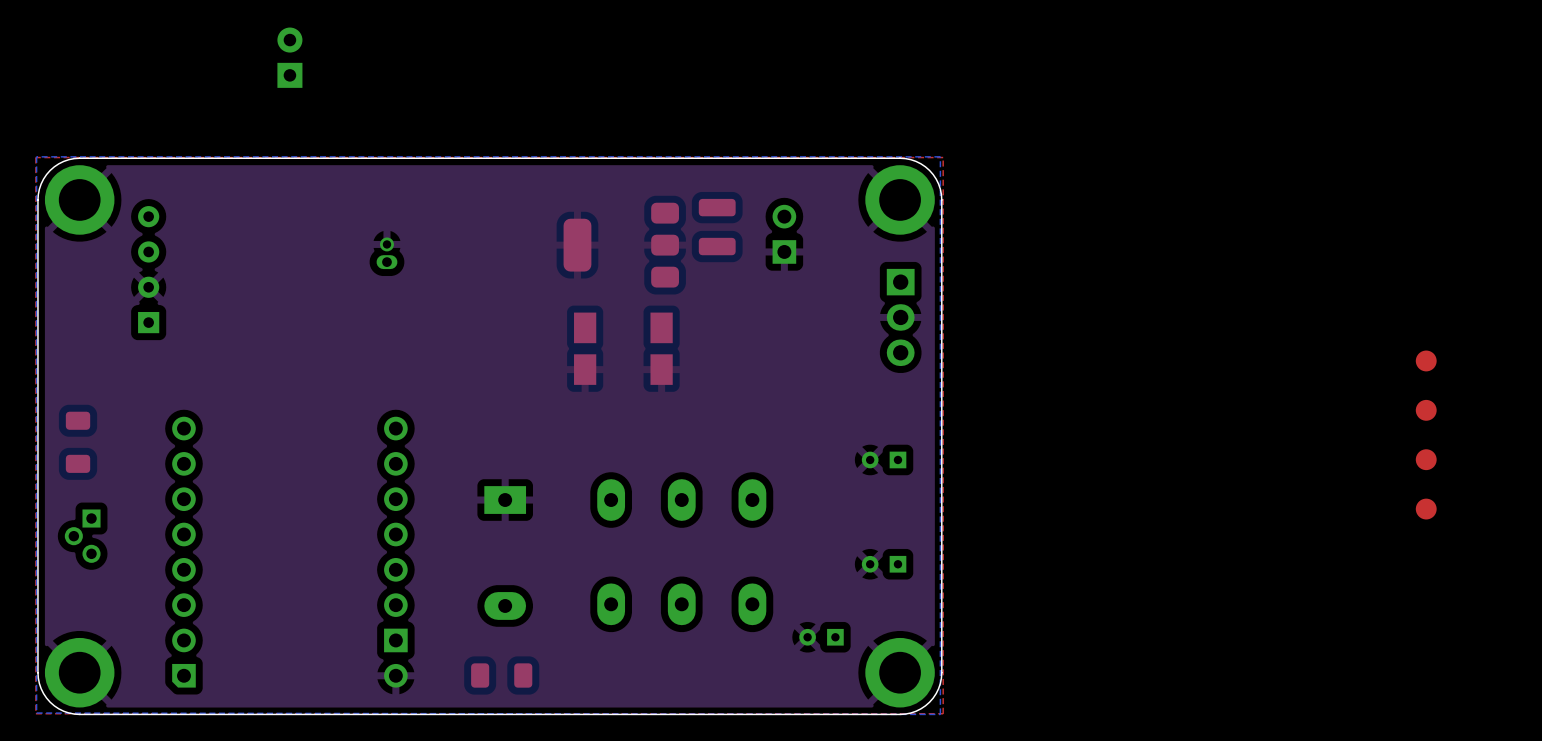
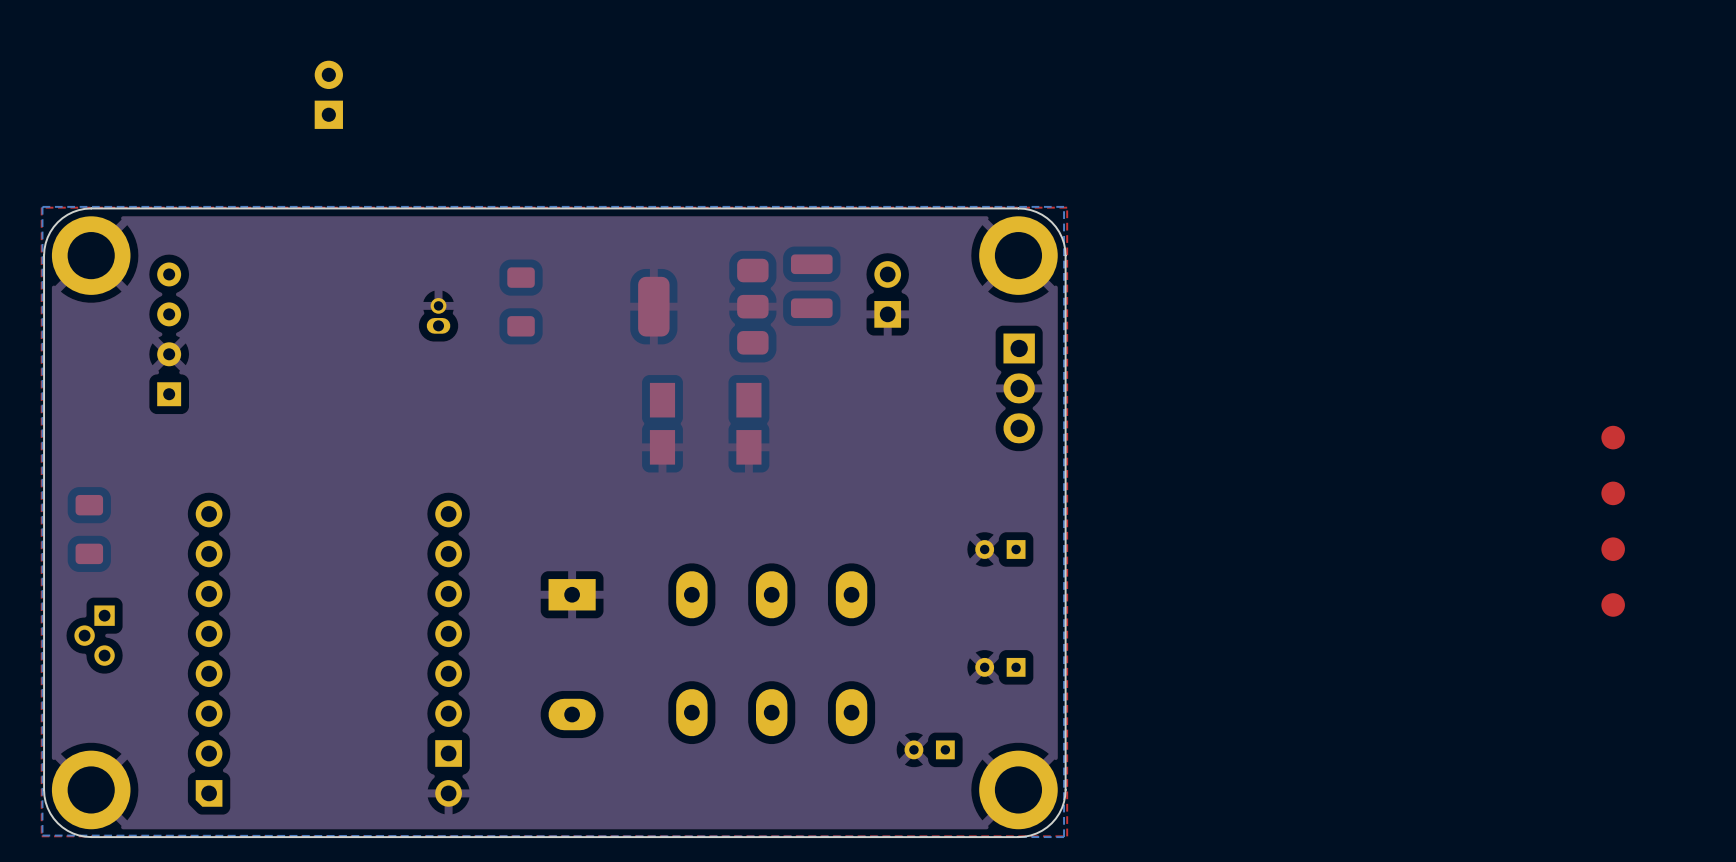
part: none -> (521, 301)
part: (501, 675) -> none

